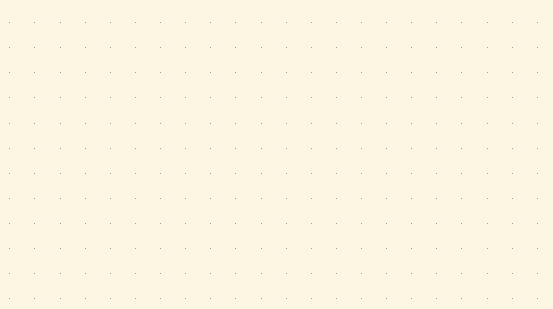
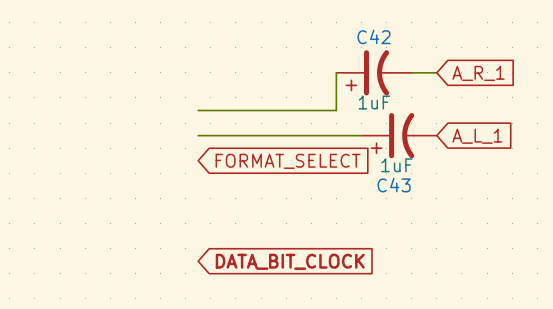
wire: none -> (336, 72) (336, 110) (198, 110)
C42: none -> 1uF (374, 72)
wire: none -> (411, 72) (436, 72)
global label: none -> A_R_1 (478, 73)
wire: none -> (198, 135) (361, 135)
C43: none -> 1uF (399, 135)
global label: none -> A_L_1 (477, 136)
global label: none -> FORMAT_SELECT (288, 161)
global label: none -> DATA_BIT_CLOCK (290, 261)

